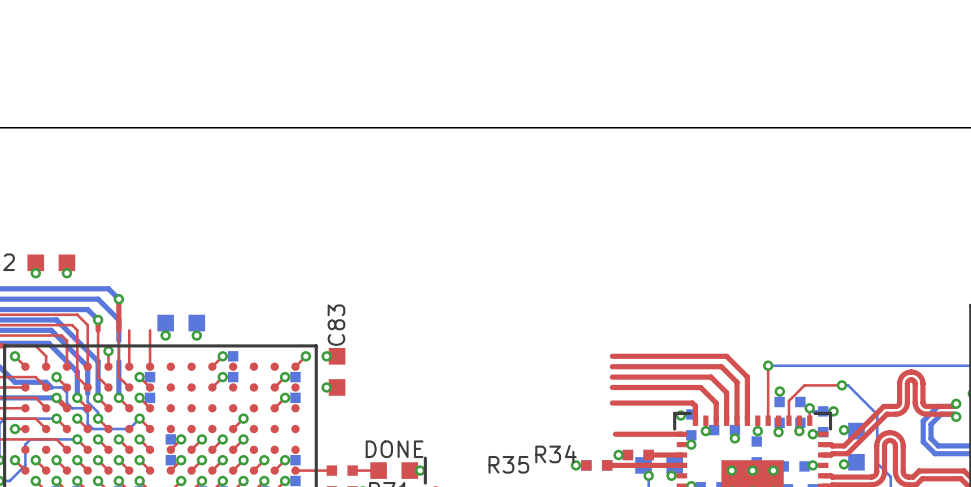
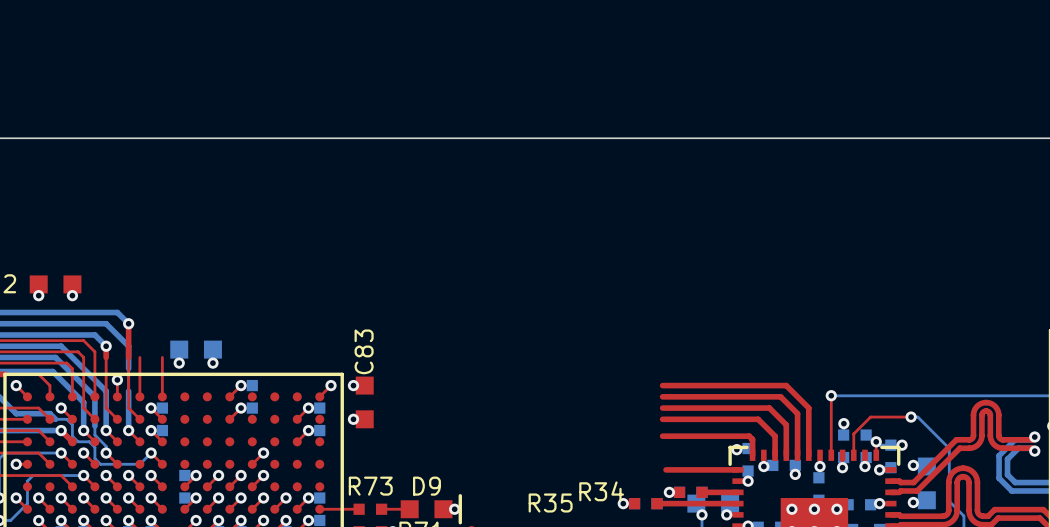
R73 name: none -> R73 (370, 486)
D9 name: none -> D9 (426, 486)
text: DONE (394, 449) -> none

